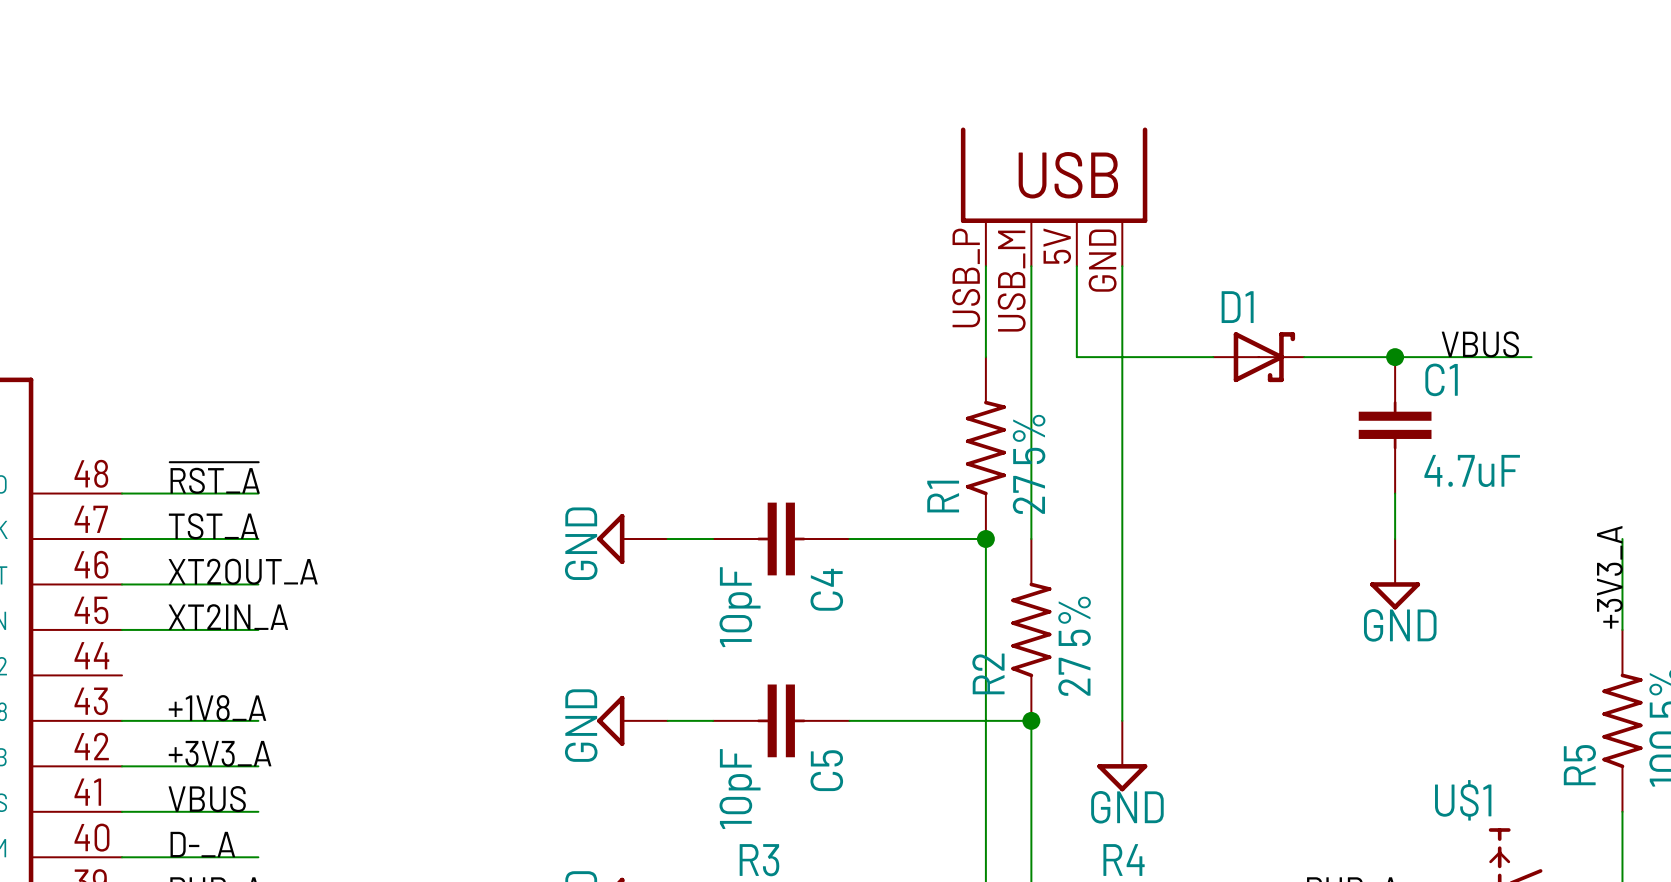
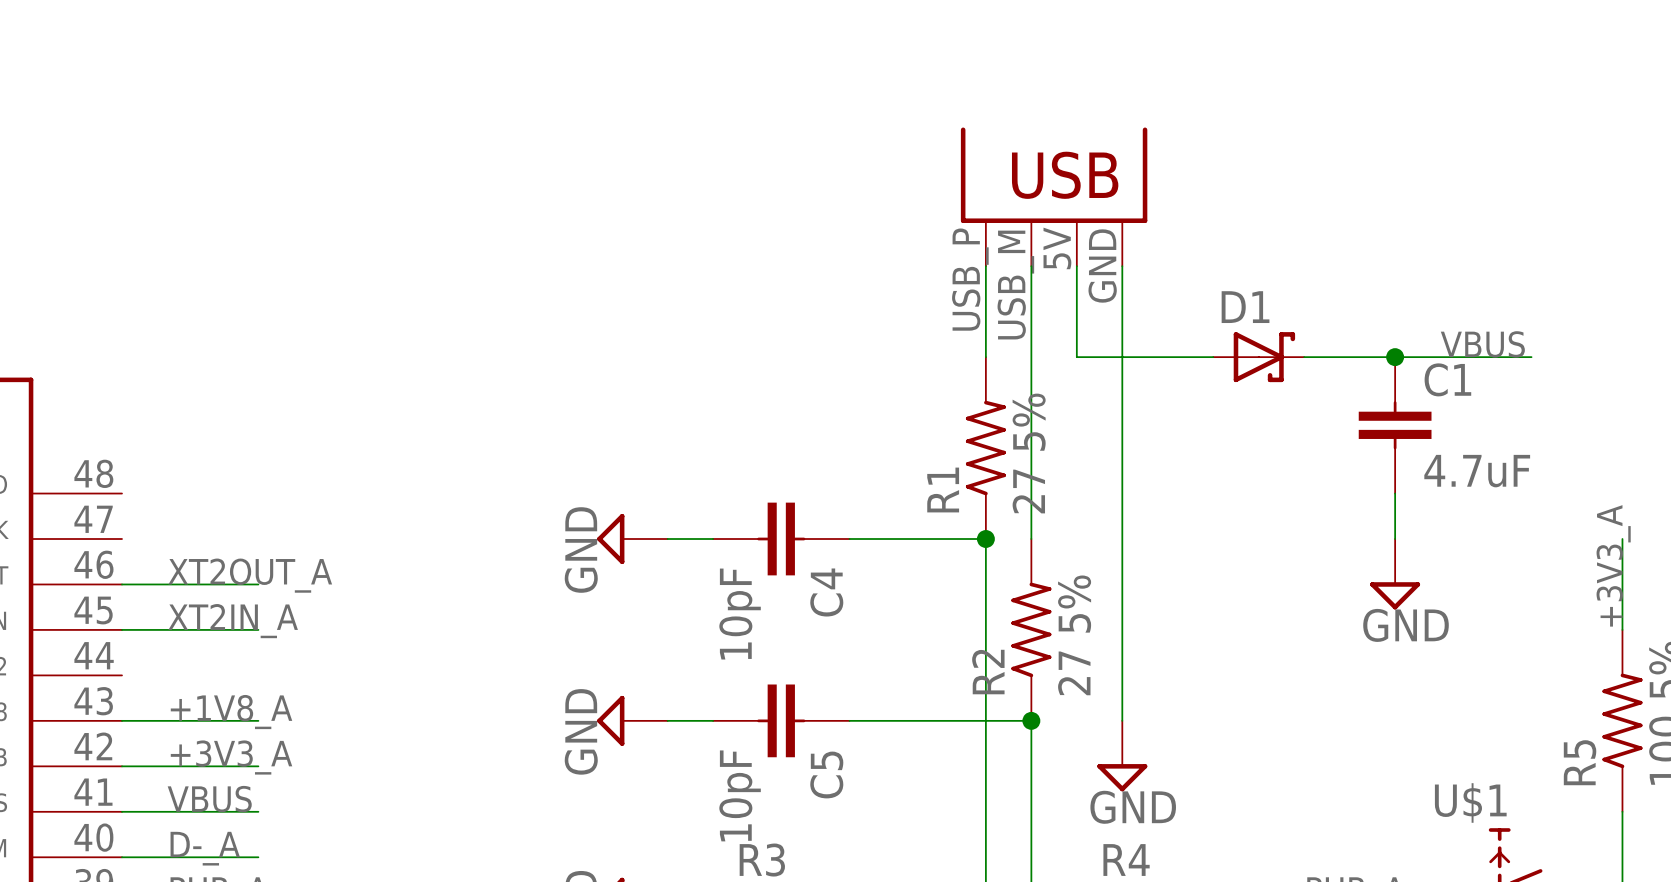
label: ~{RST_A} (214, 478) -> none
wire: (121, 493) (258, 493) -> none
label: TST_A (213, 526) -> none
wire: (121, 539) (258, 539) -> none

